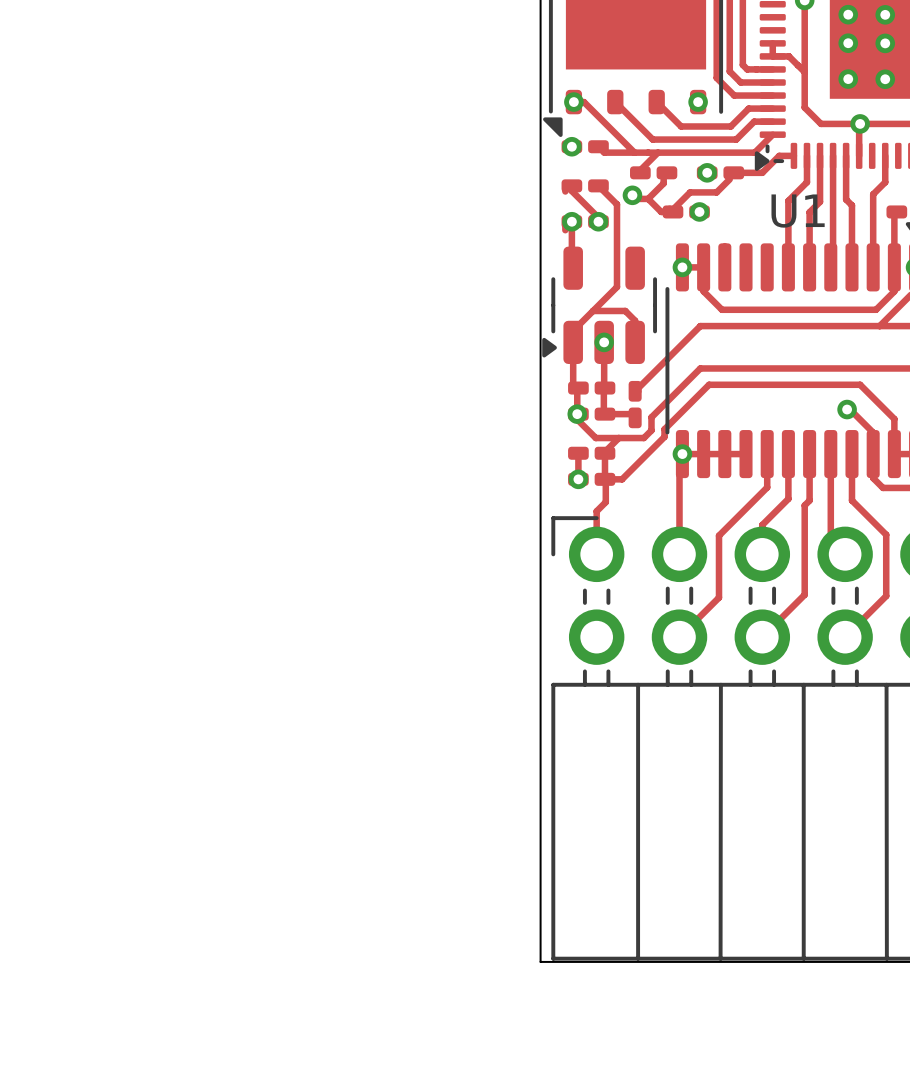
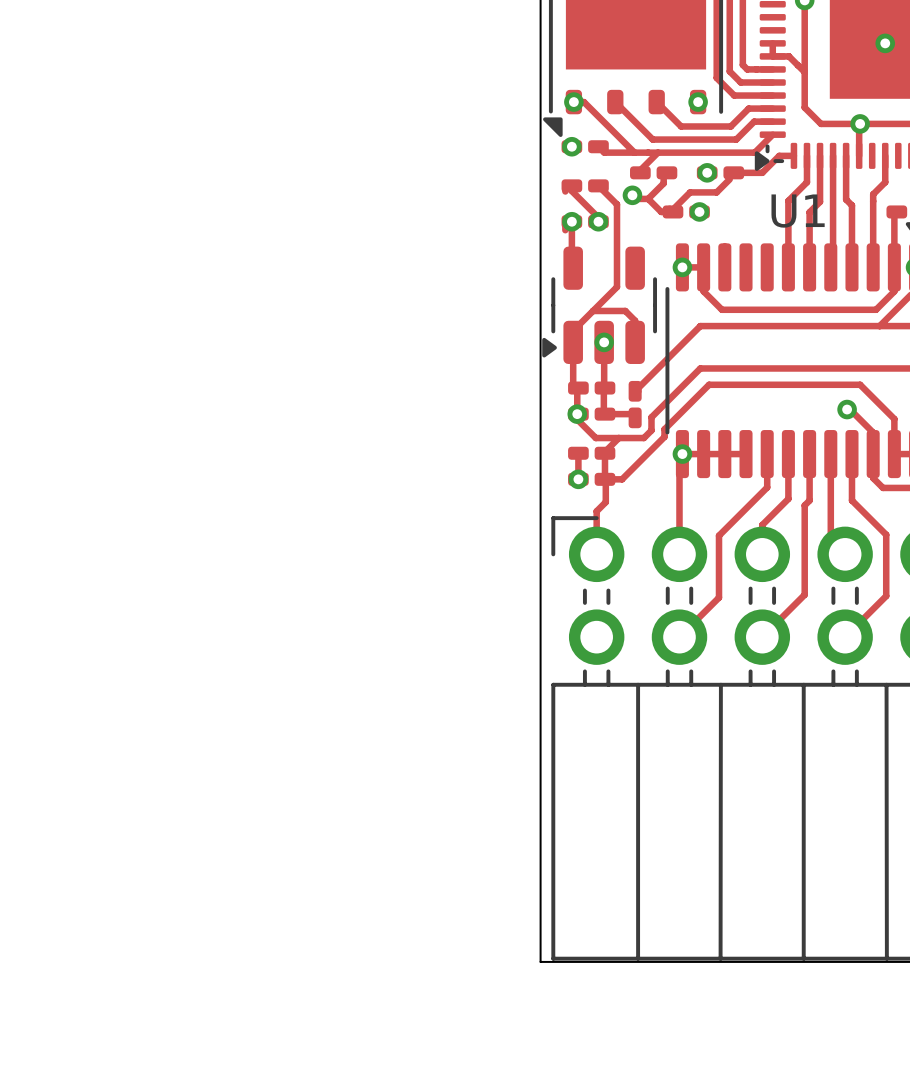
via: (848, 14) -> none
via: (885, 14) -> none
via: (848, 43) -> none
via: (848, 79) -> none
via: (885, 79) -> none

